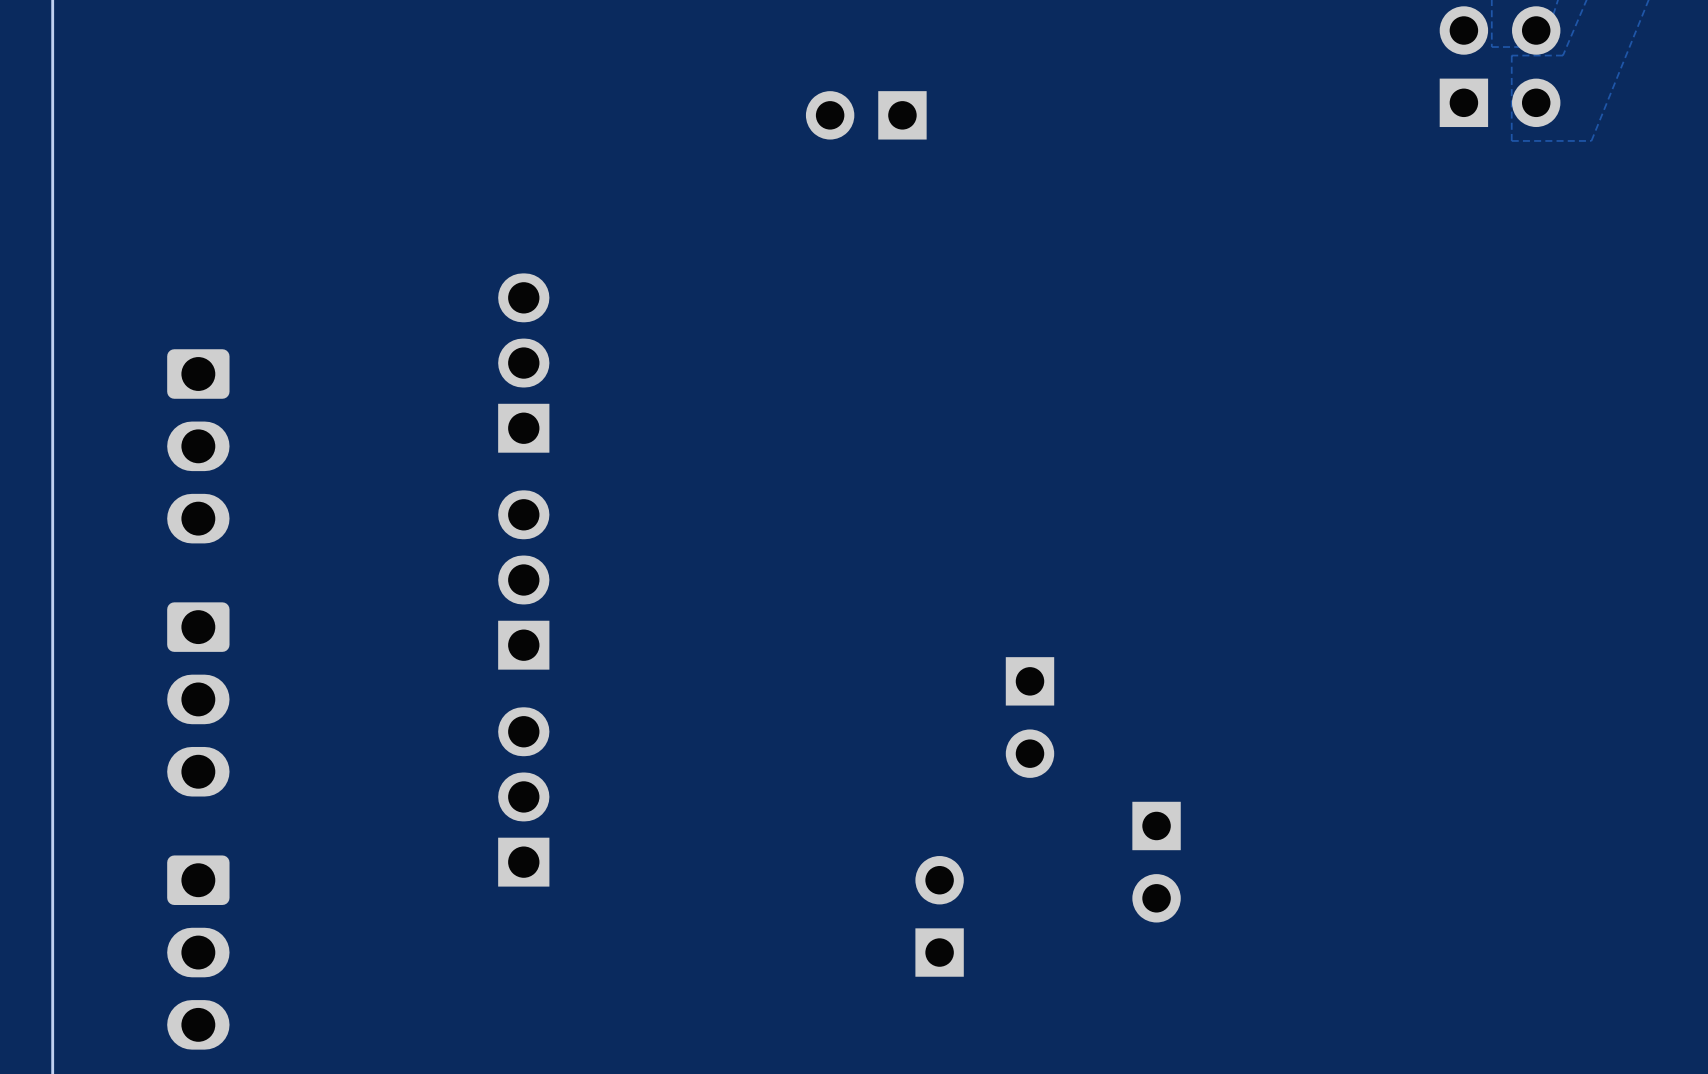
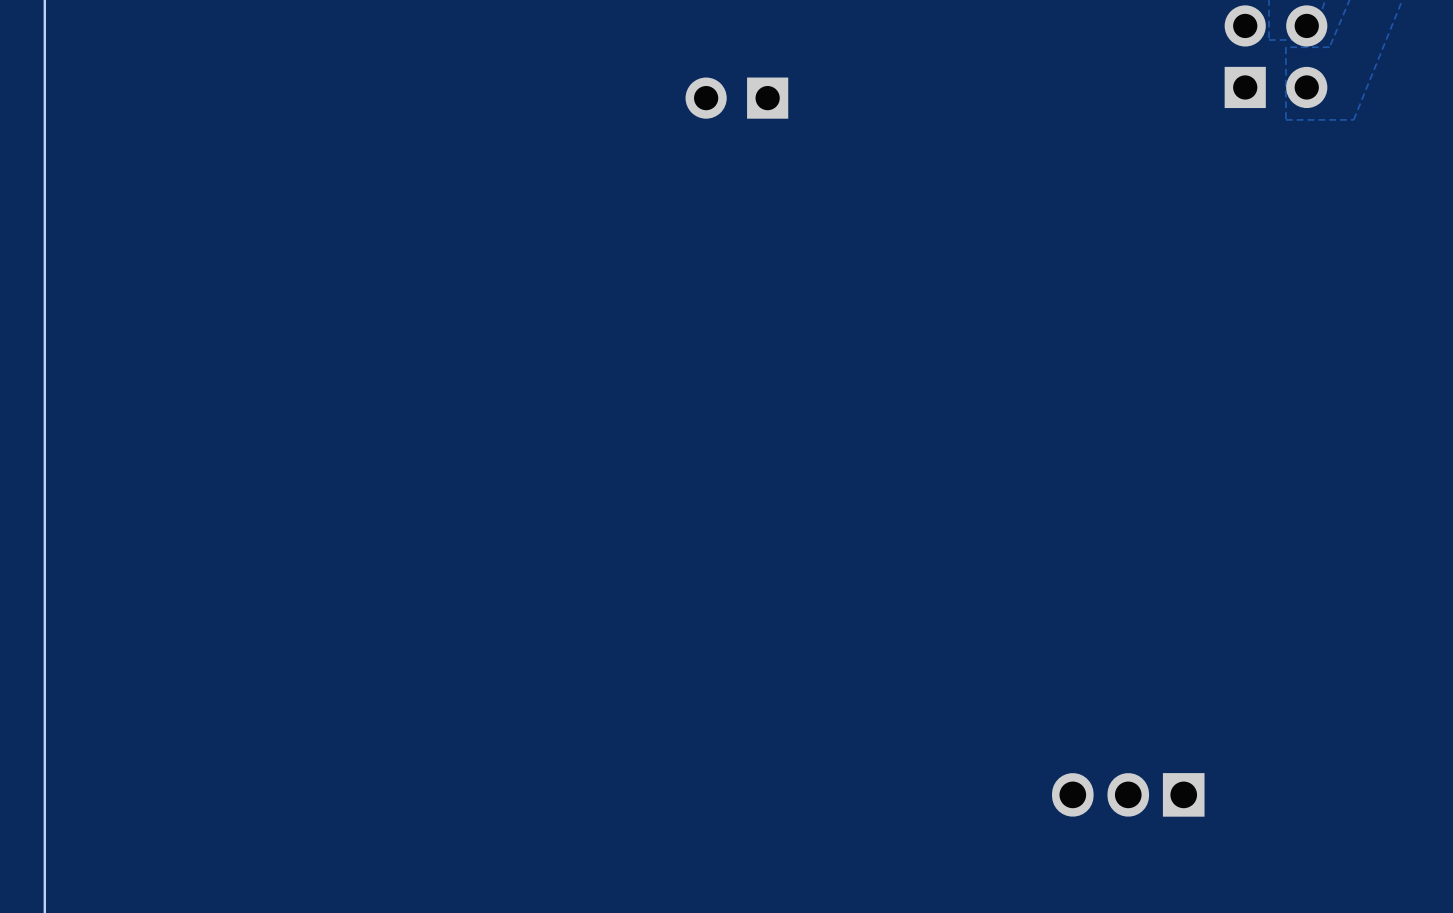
part: (523, 363) -> none
part: (198, 446) -> none
part: (523, 579) -> none
part: (198, 699) -> none
part: (1030, 717) -> none
part: (523, 796) -> none
part: (1156, 862) -> none
part: (939, 916) -> none
part: none -> (1128, 794)
part: (198, 952) -> none

